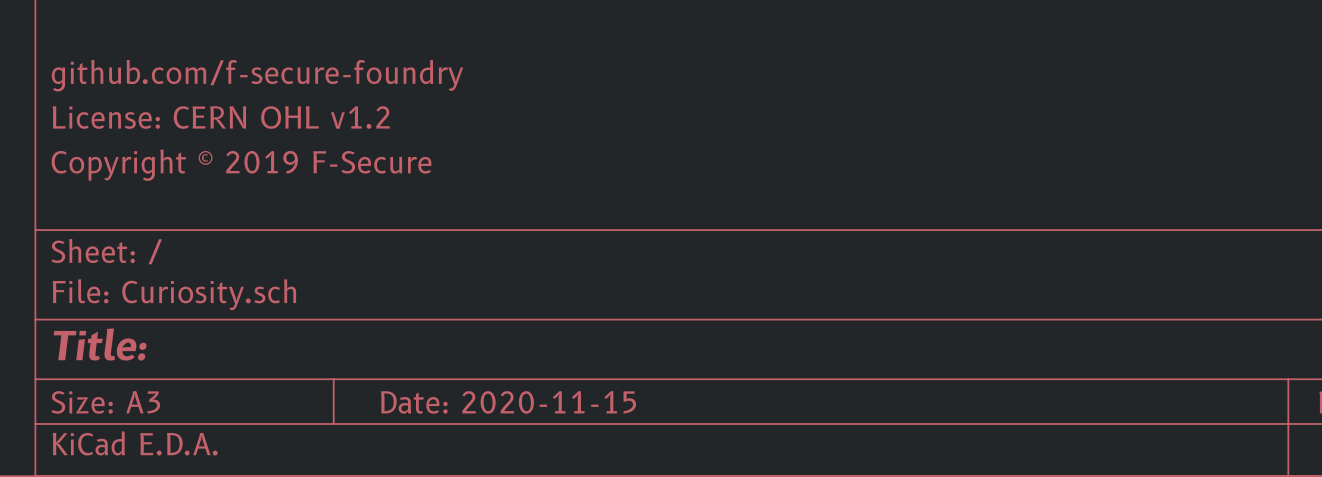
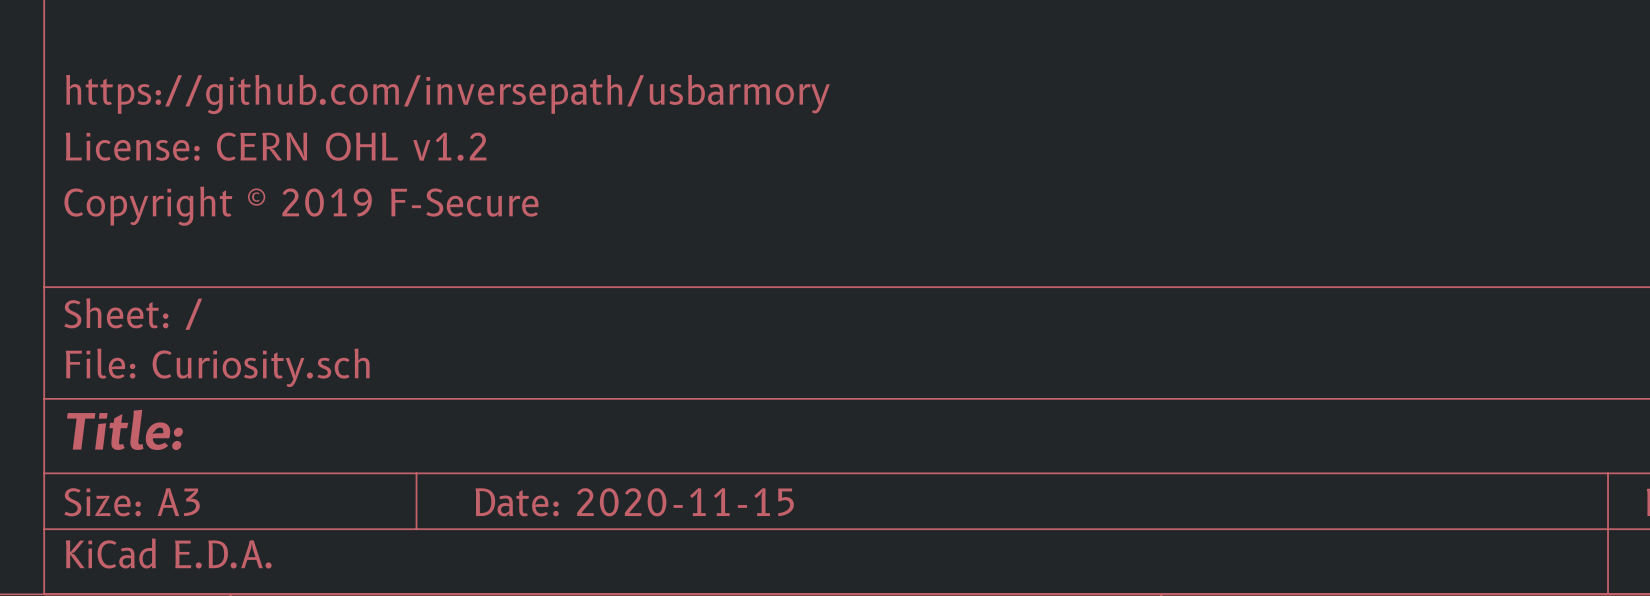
title block: github.com/f-secure-foundry (257, 75) -> https://github.com/inversepath/usbarmory (447, 94)

